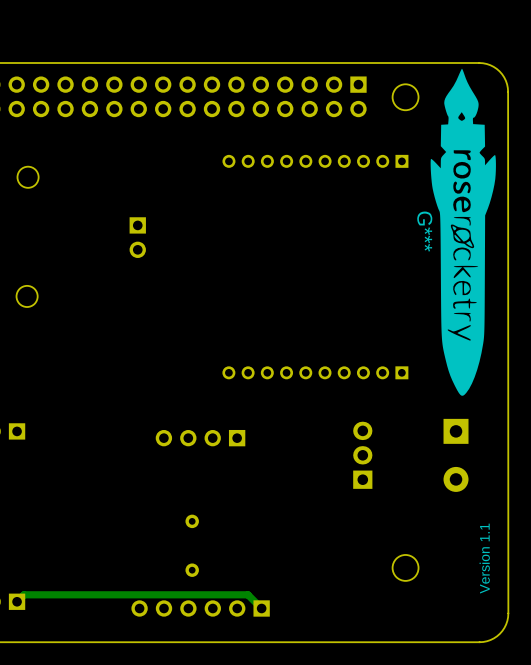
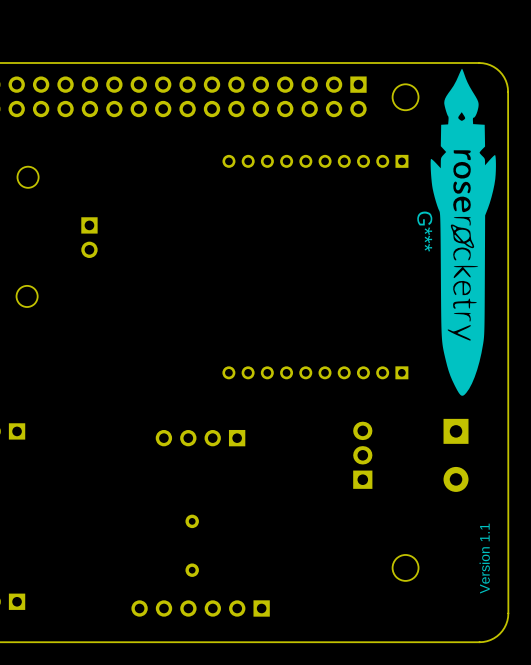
part position: (137, 237) -> (89, 237)
track: (17, 601) (24, 594) (247, 594) (261, 608) -> none

